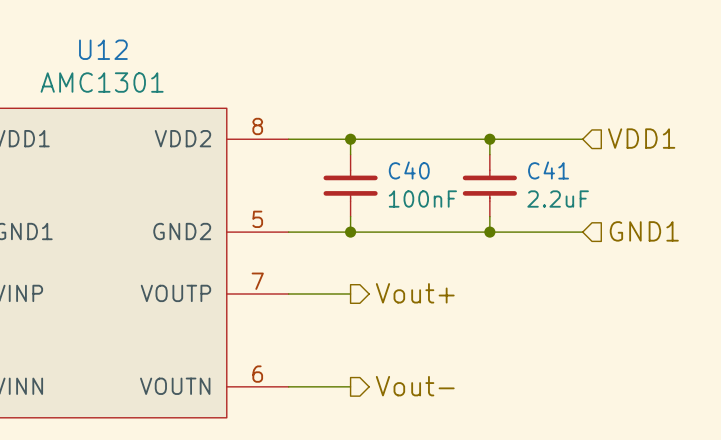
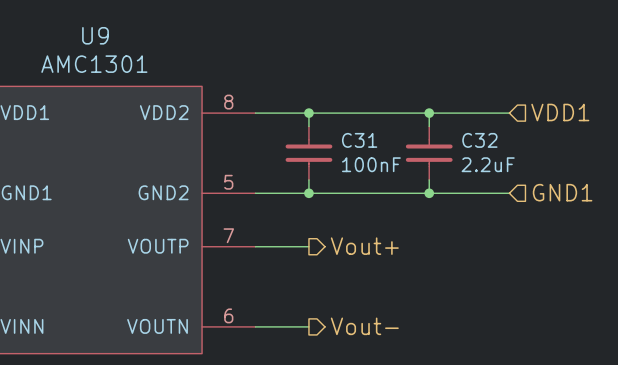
U12 name: U12 (103, 49) -> U9 (95, 35)
C40 name: C40 (409, 170) -> C31 (359, 140)
C41 name: C41 (548, 170) -> C32 (479, 140)

